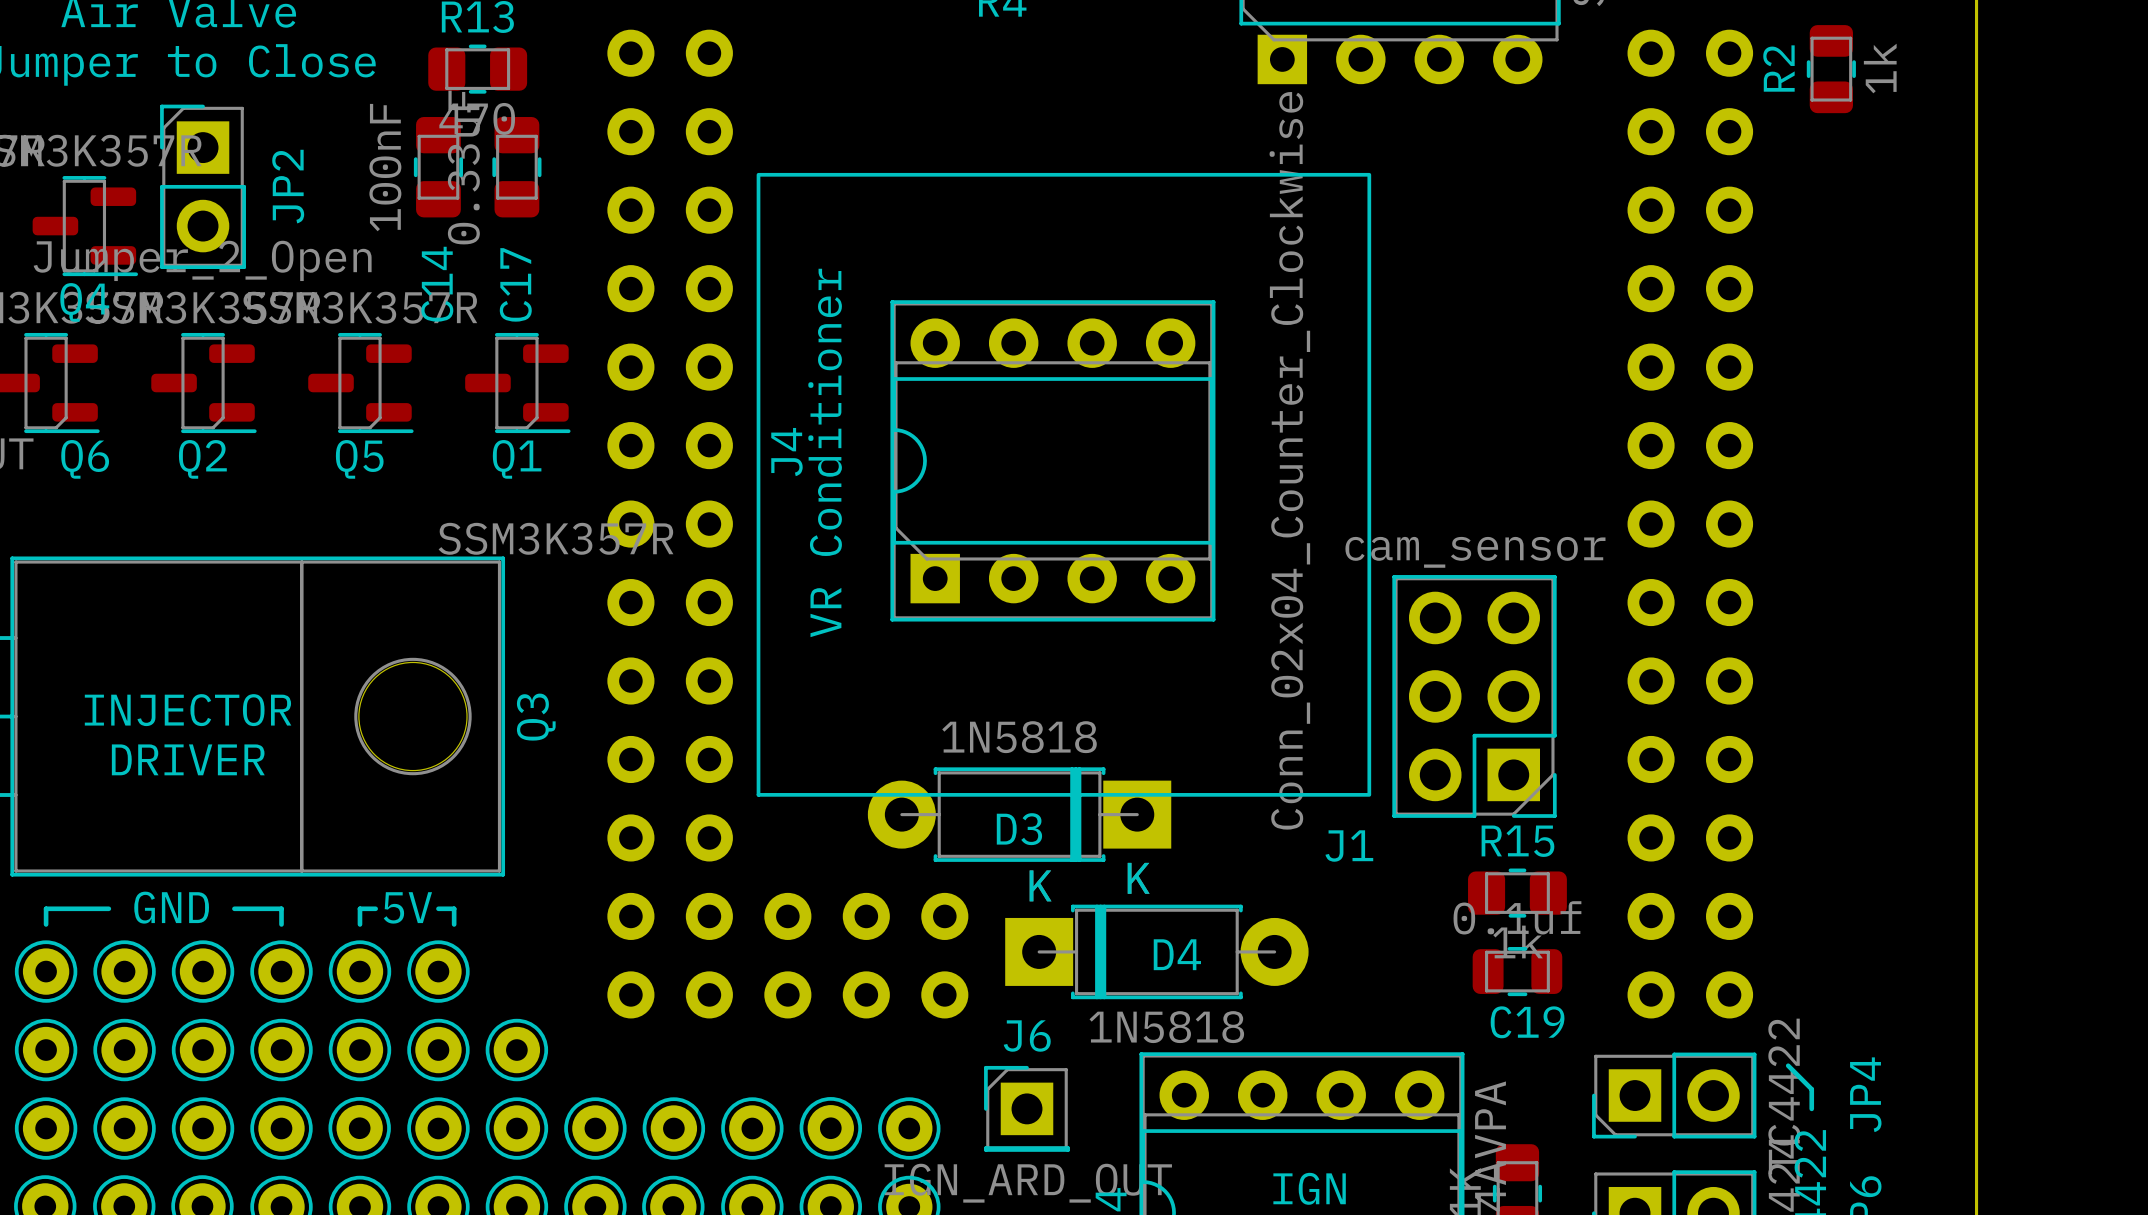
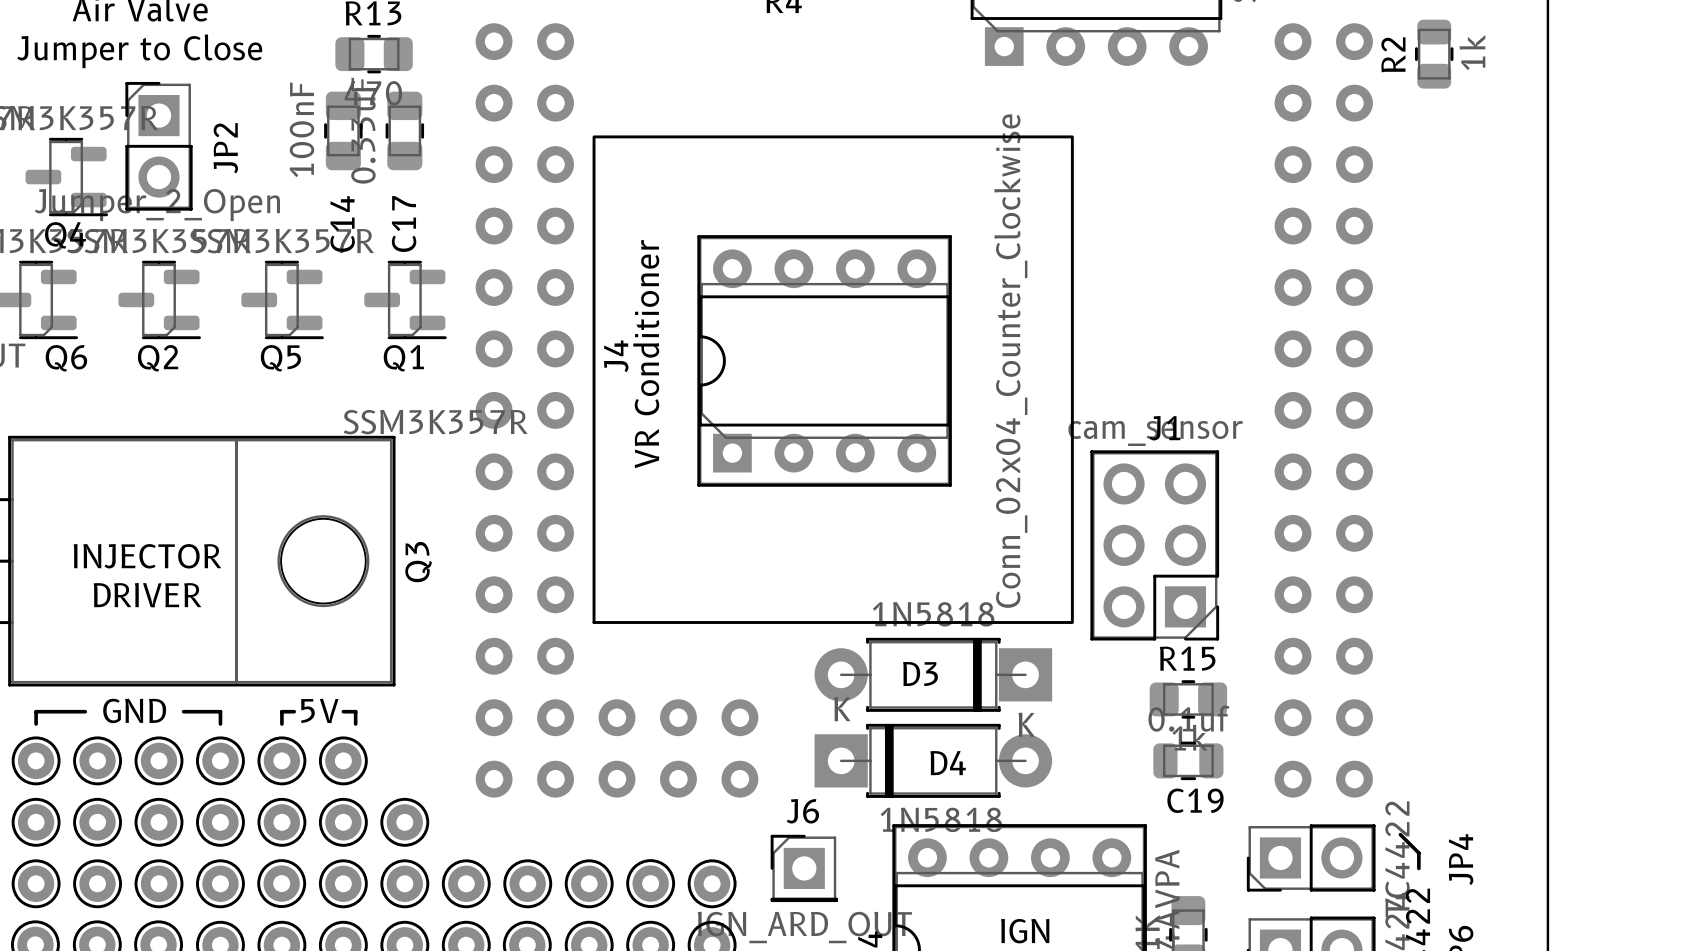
D3 position: (1019, 814) -> (933, 674)
D3 name position: D3 (1019, 829) -> D3 (920, 674)
J1 name position: J1 (1349, 846) -> J1 (1164, 428)
D4 position: (1156, 951) -> (933, 760)

